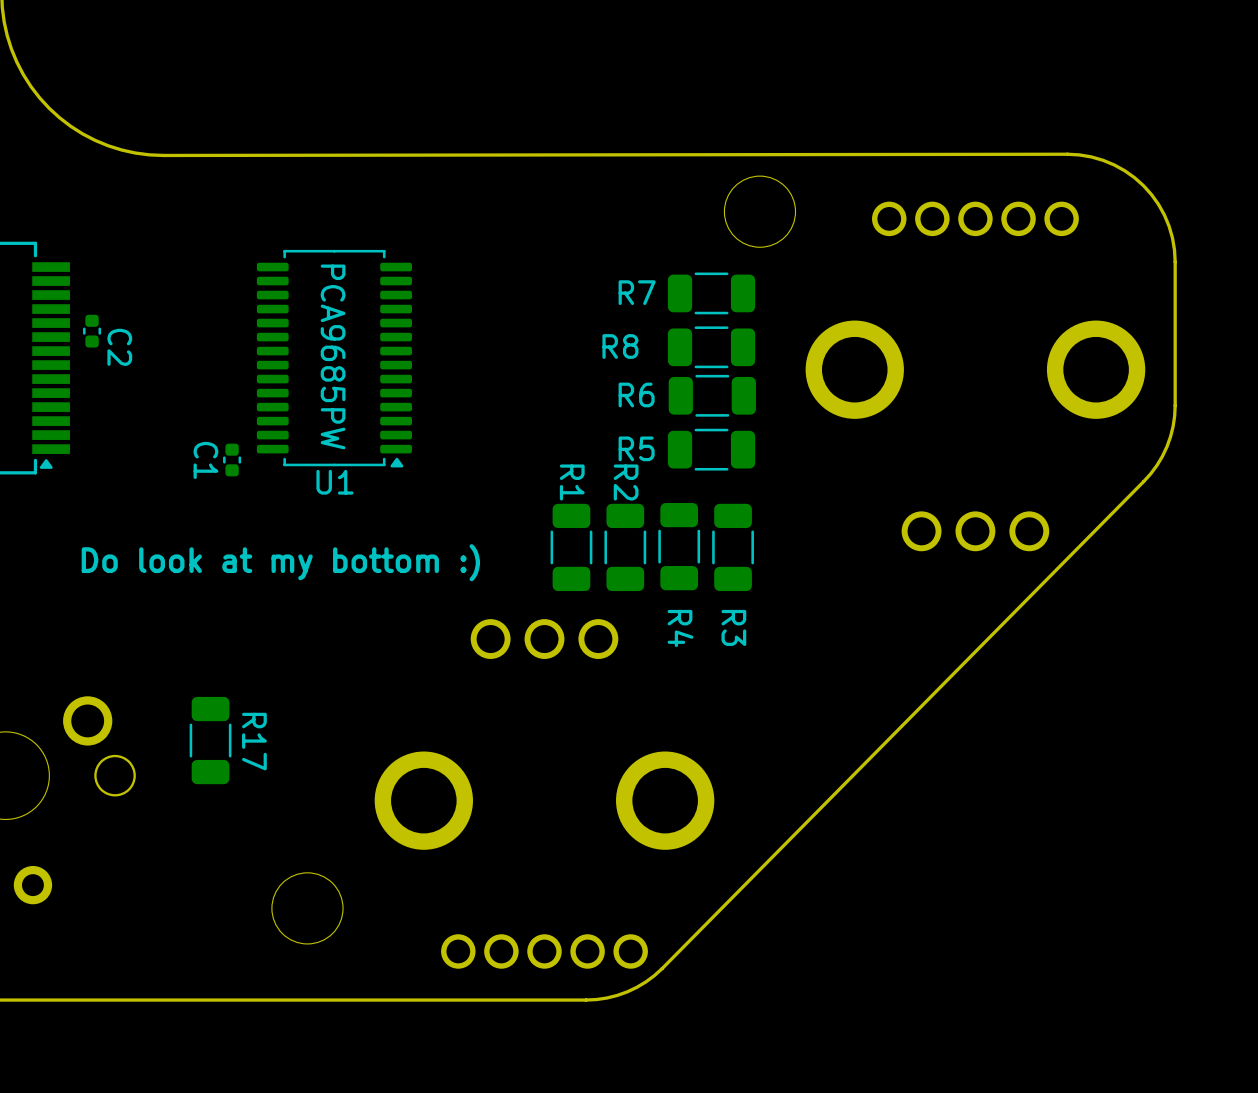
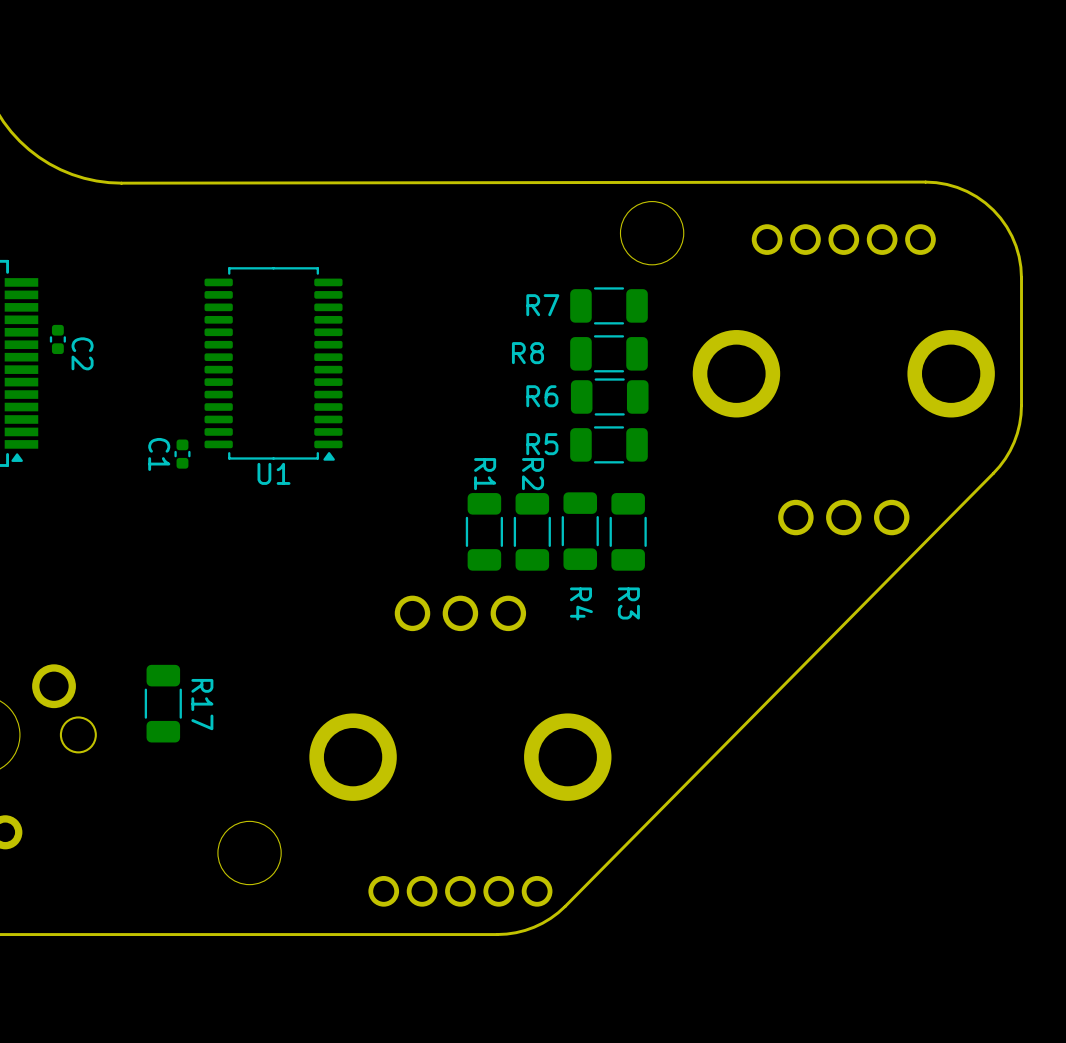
U1 value: PCA9685PW (333, 356) -> none
text: Do look at my bottom :) (280, 562) -> none

